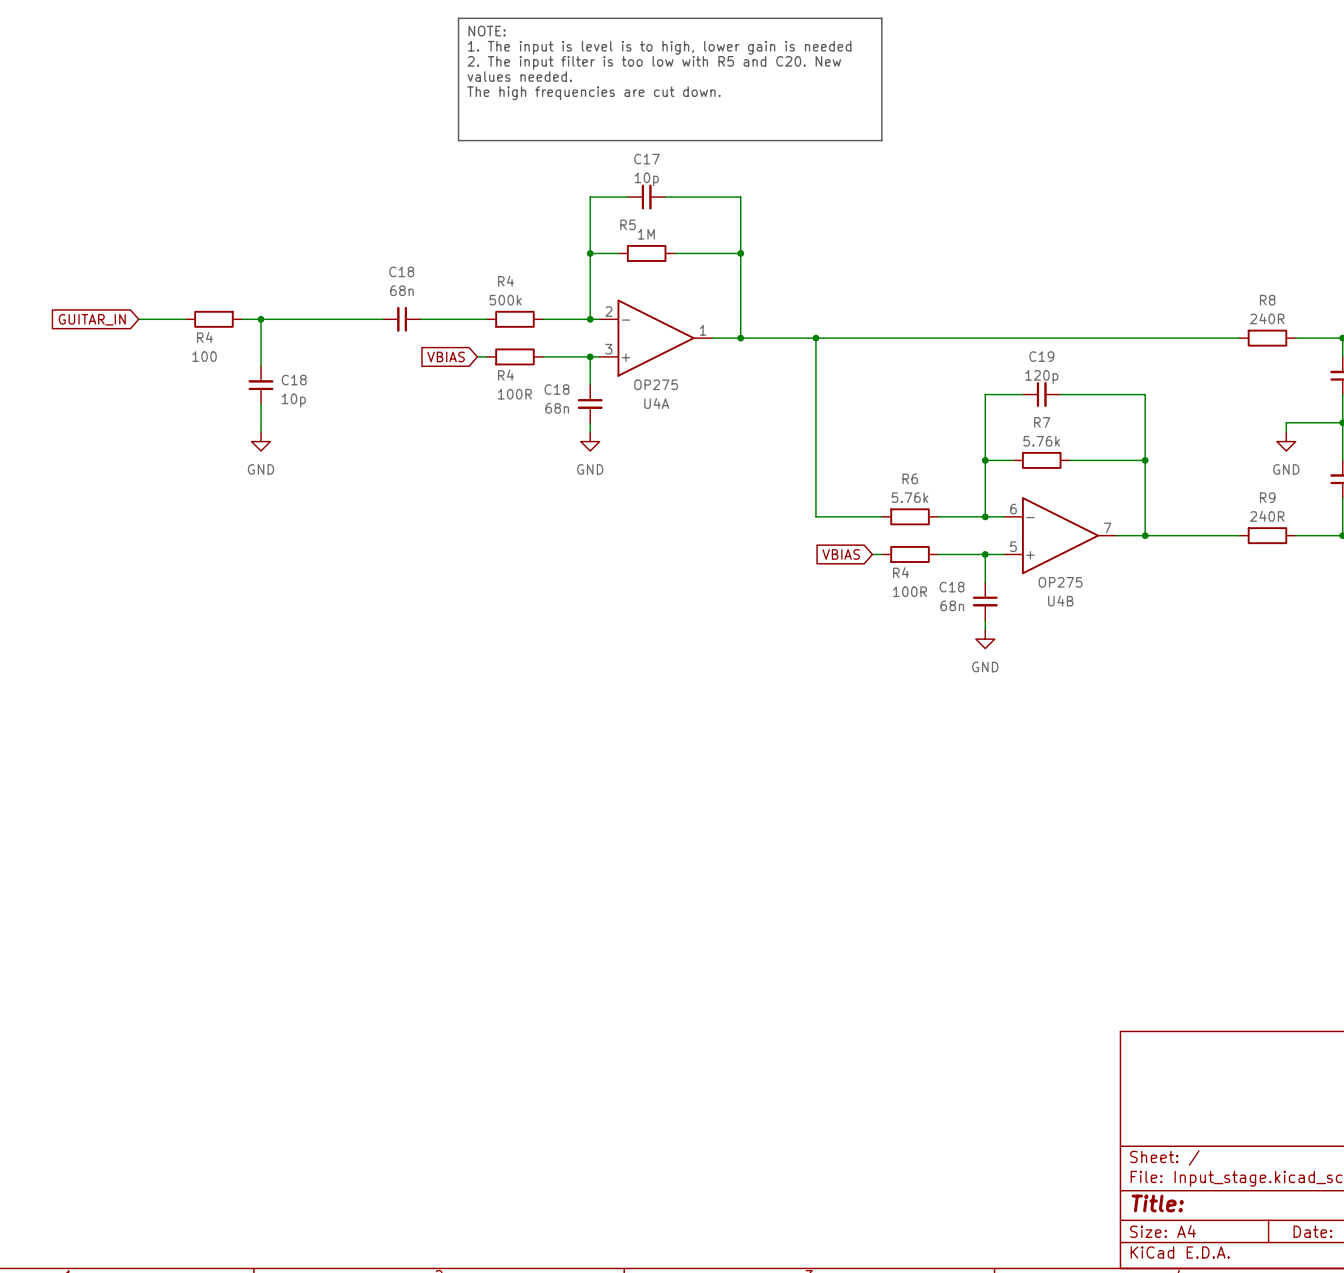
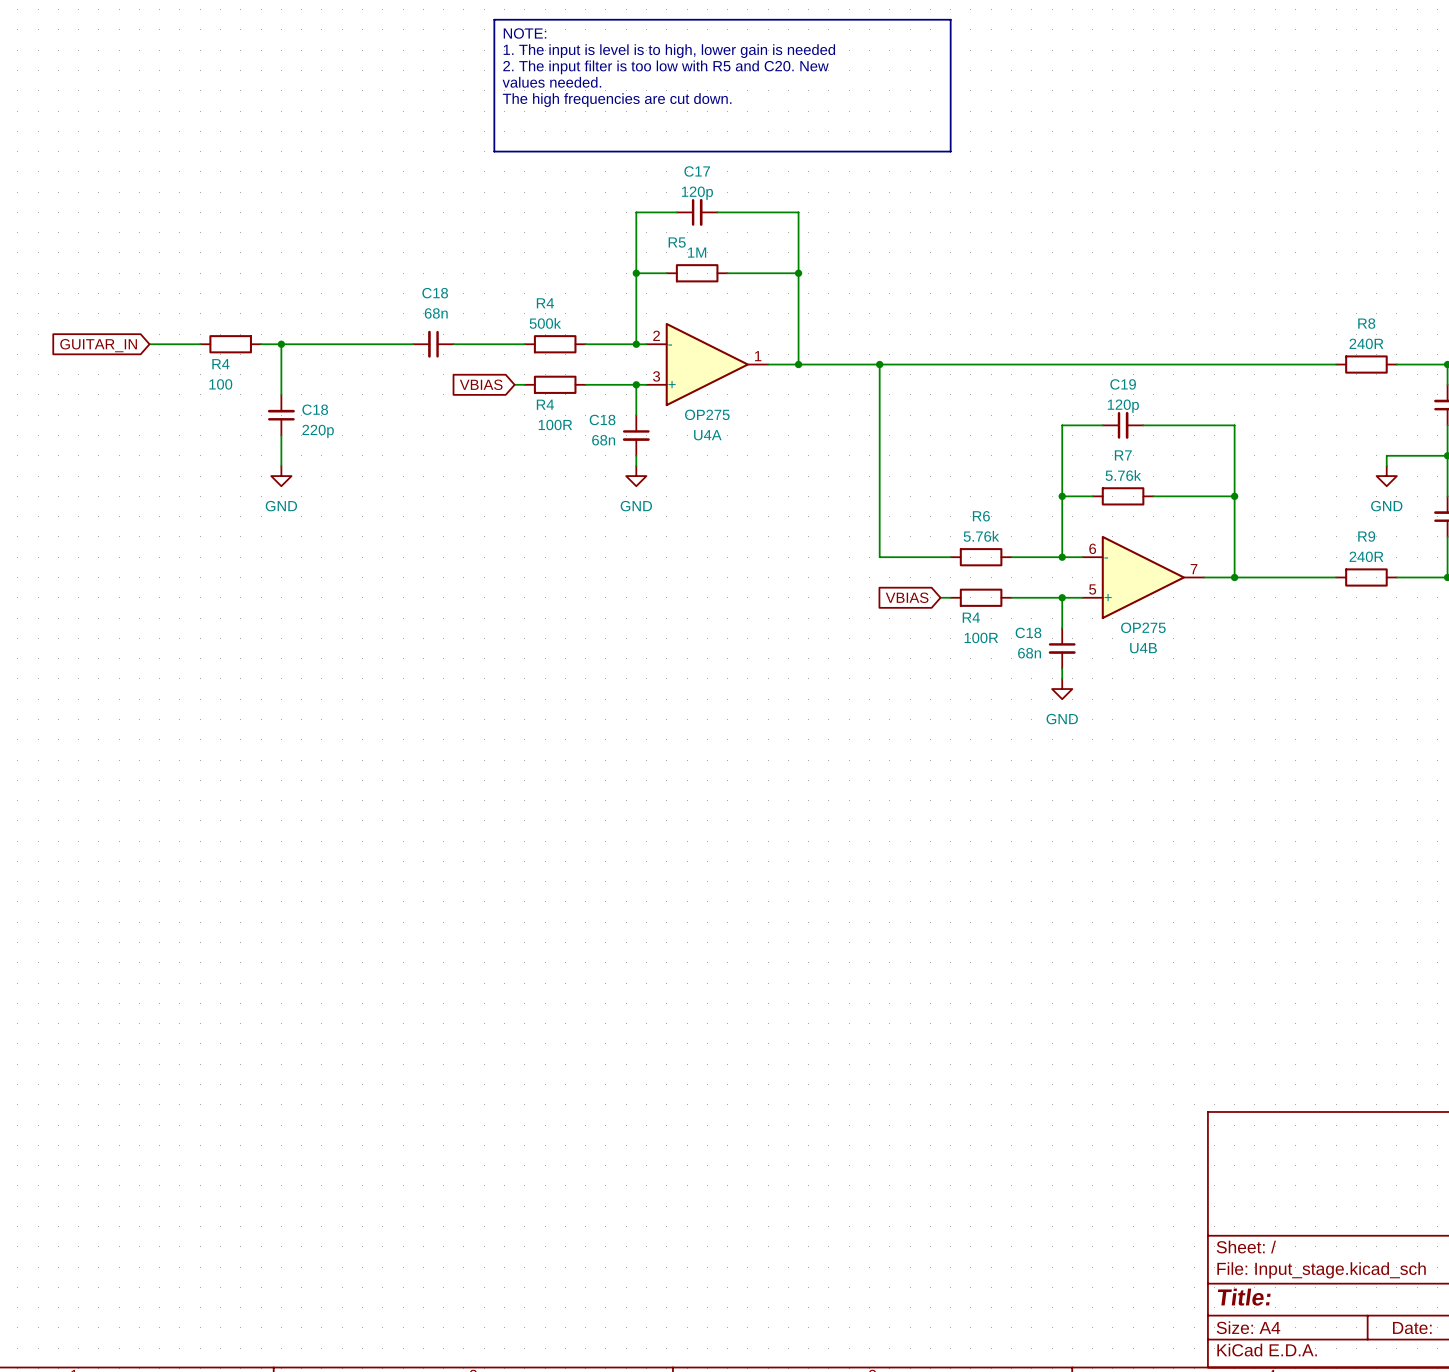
C17 value: 10p (646, 179) -> 120p (697, 193)
C18 value: 10p (293, 400) -> 220p (318, 431)

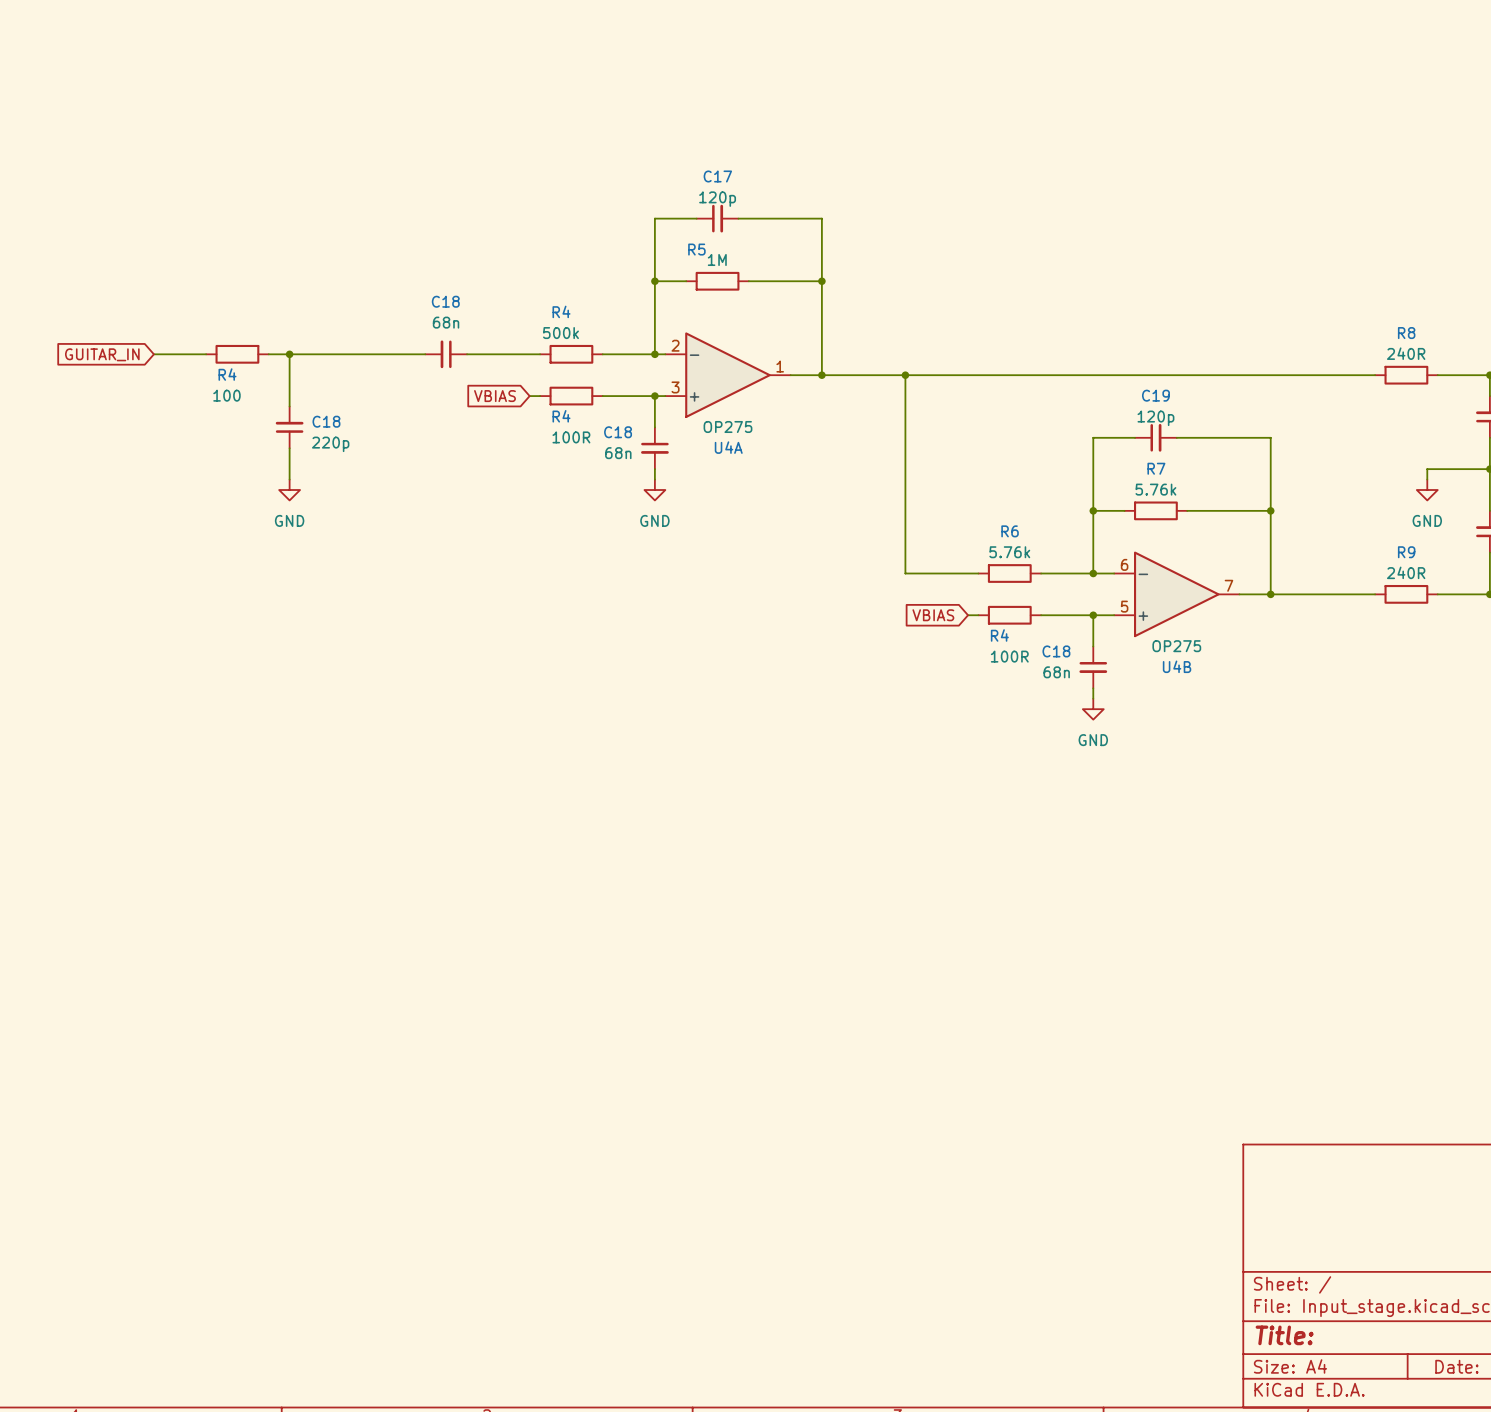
line: (494, 19) (950, 19) (950, 151) (494, 151) (494, 19) -> none
text: NOTE: (525, 33) -> none
text: 1. The input is level is to high, lower gain is needed (669, 51) -> none
text: 2. The input filter is too low with R5 and C20. New (665, 67) -> none
text: values needed. (551, 82) -> none
text: The high frequencies are cut down. (617, 100) -> none

